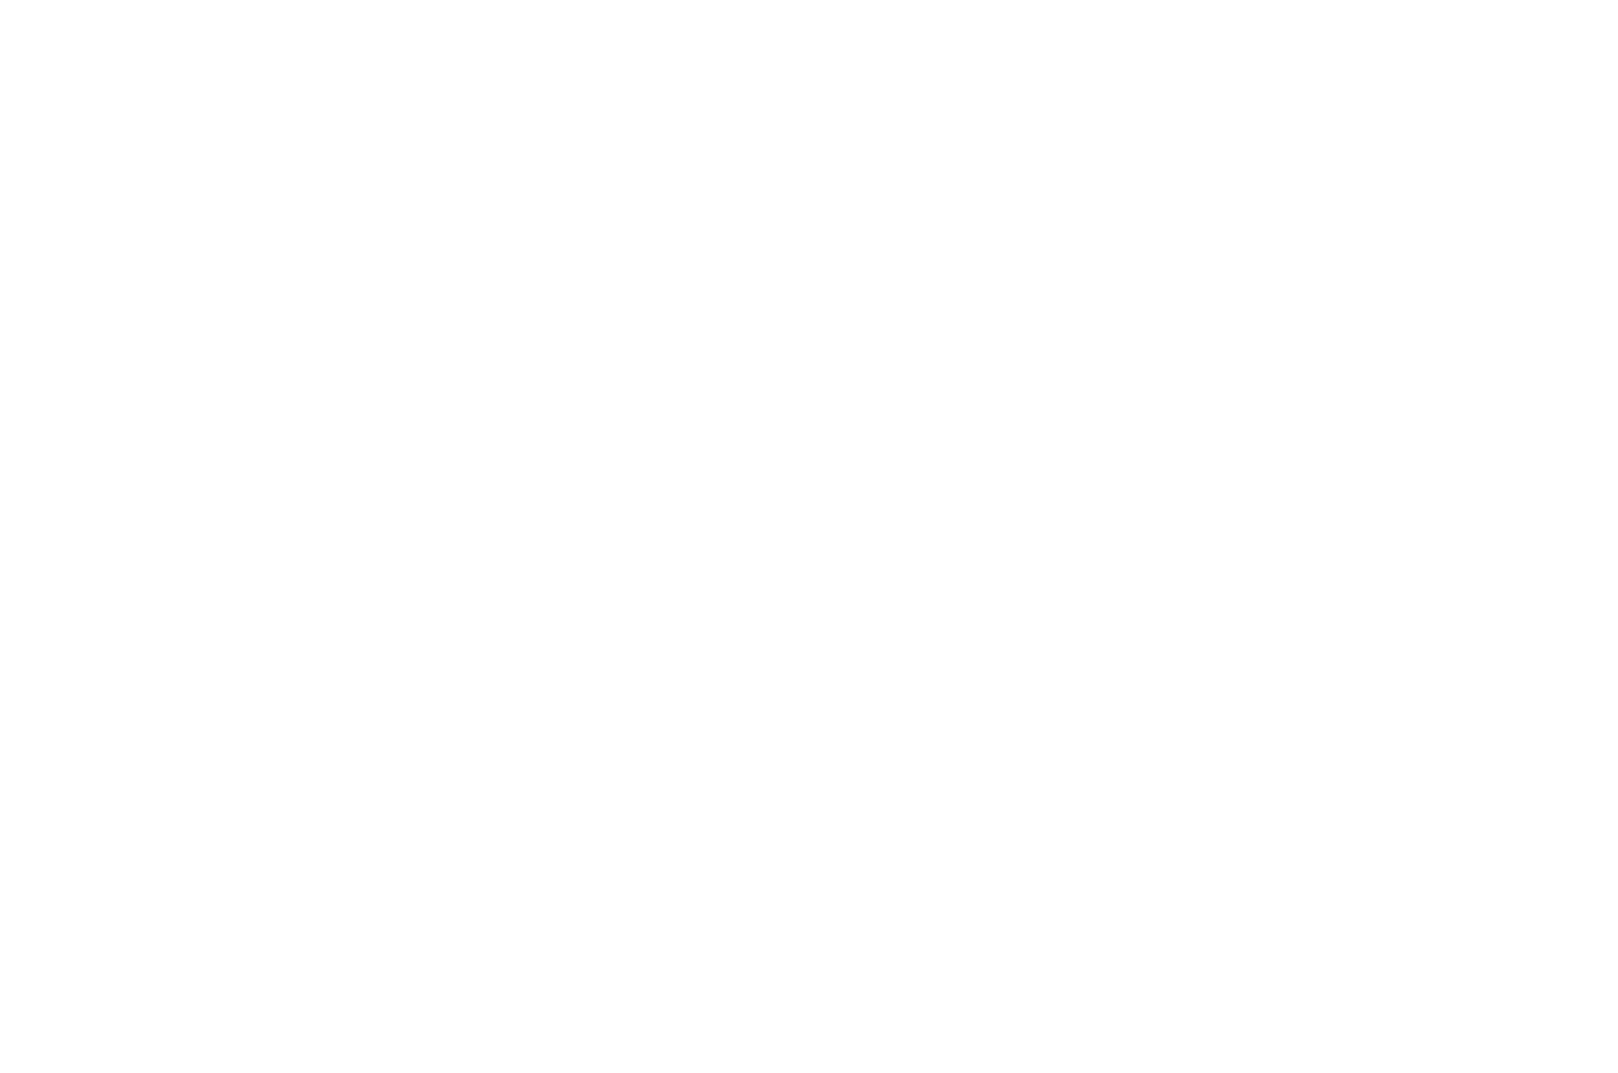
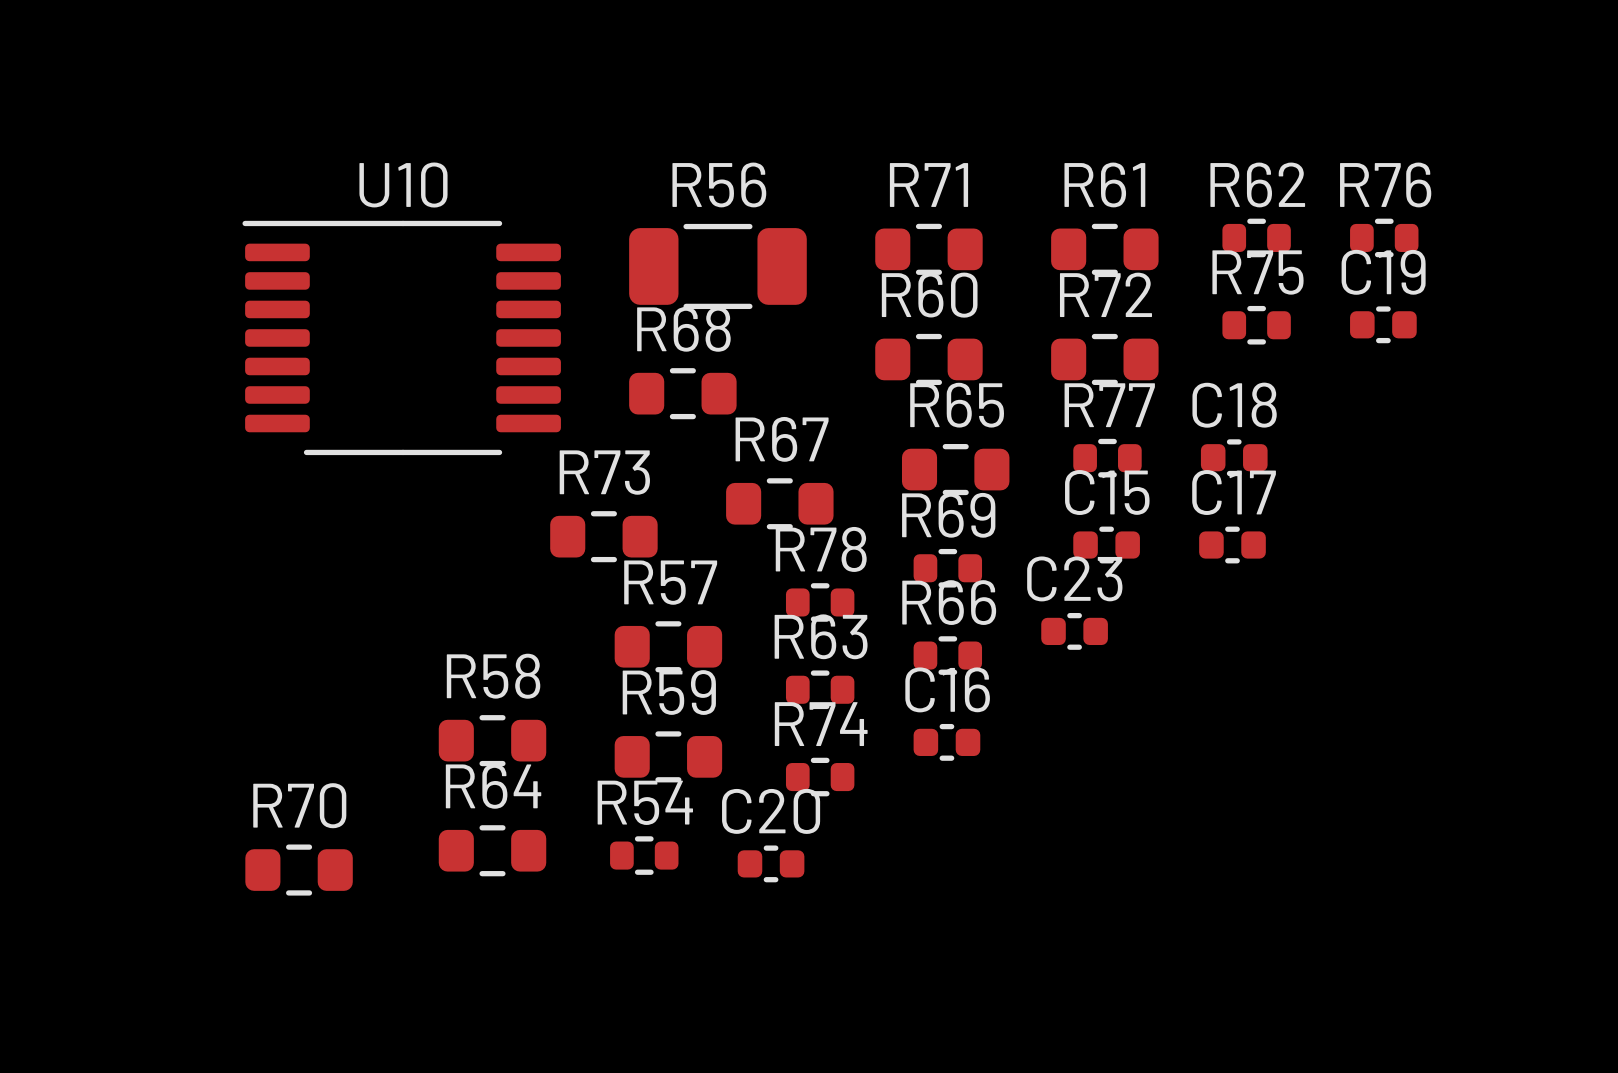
R62: none -> (1256, 237)
R76: none -> (1384, 237)
R71: none -> (928, 249)
R61: none -> (1104, 249)
R56: none -> (717, 266)
C19: none -> (1383, 324)
R75: none -> (1256, 325)
U10: none -> (401, 337)
R60: none -> (928, 359)
R72: none -> (1104, 359)
R68: none -> (682, 393)
C18: none -> (1234, 457)
R77: none -> (1107, 458)
R65: none -> (955, 469)
R67: none -> (779, 503)
R73: none -> (603, 536)
C15: none -> (1106, 545)
C17: none -> (1232, 545)
R69: none -> (947, 568)
R78: none -> (820, 602)
C23: none -> (1074, 631)
R57: none -> (668, 646)
R66: none -> (947, 655)
R63: none -> (820, 689)
R58: none -> (492, 740)
C16: none -> (946, 742)
R59: none -> (668, 756)
R74: none -> (820, 777)
R64: none -> (492, 850)
R54: none -> (644, 855)
C20: none -> (771, 863)
R70: none -> (299, 870)

